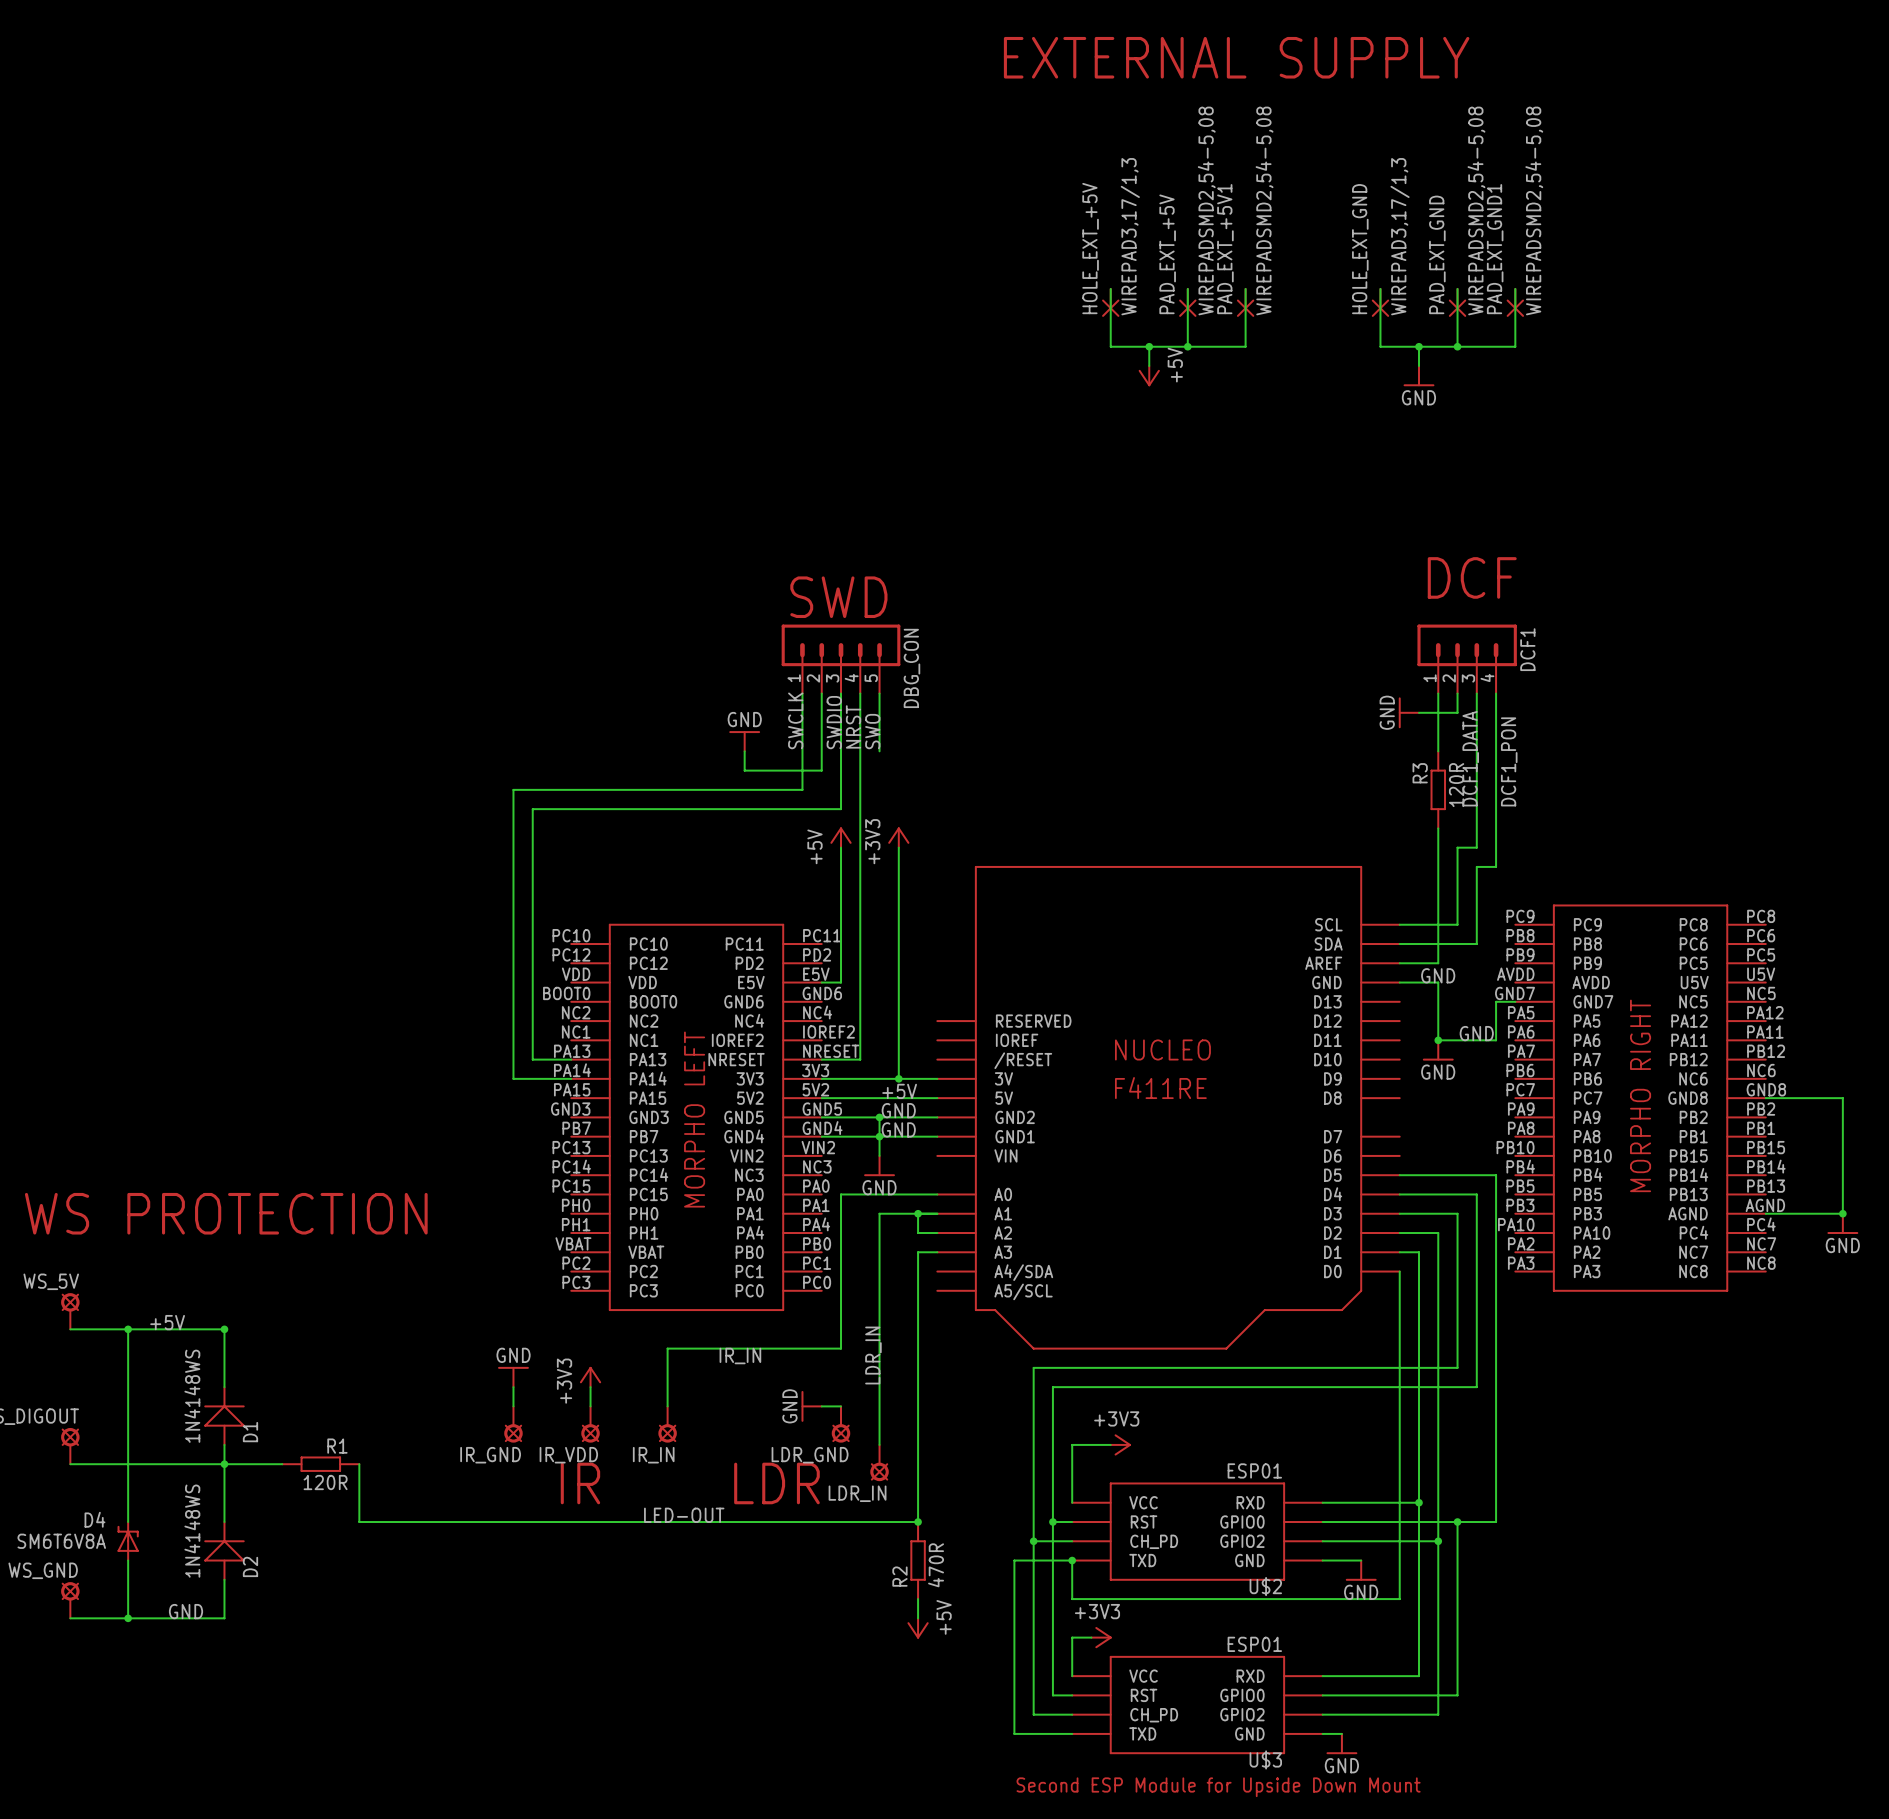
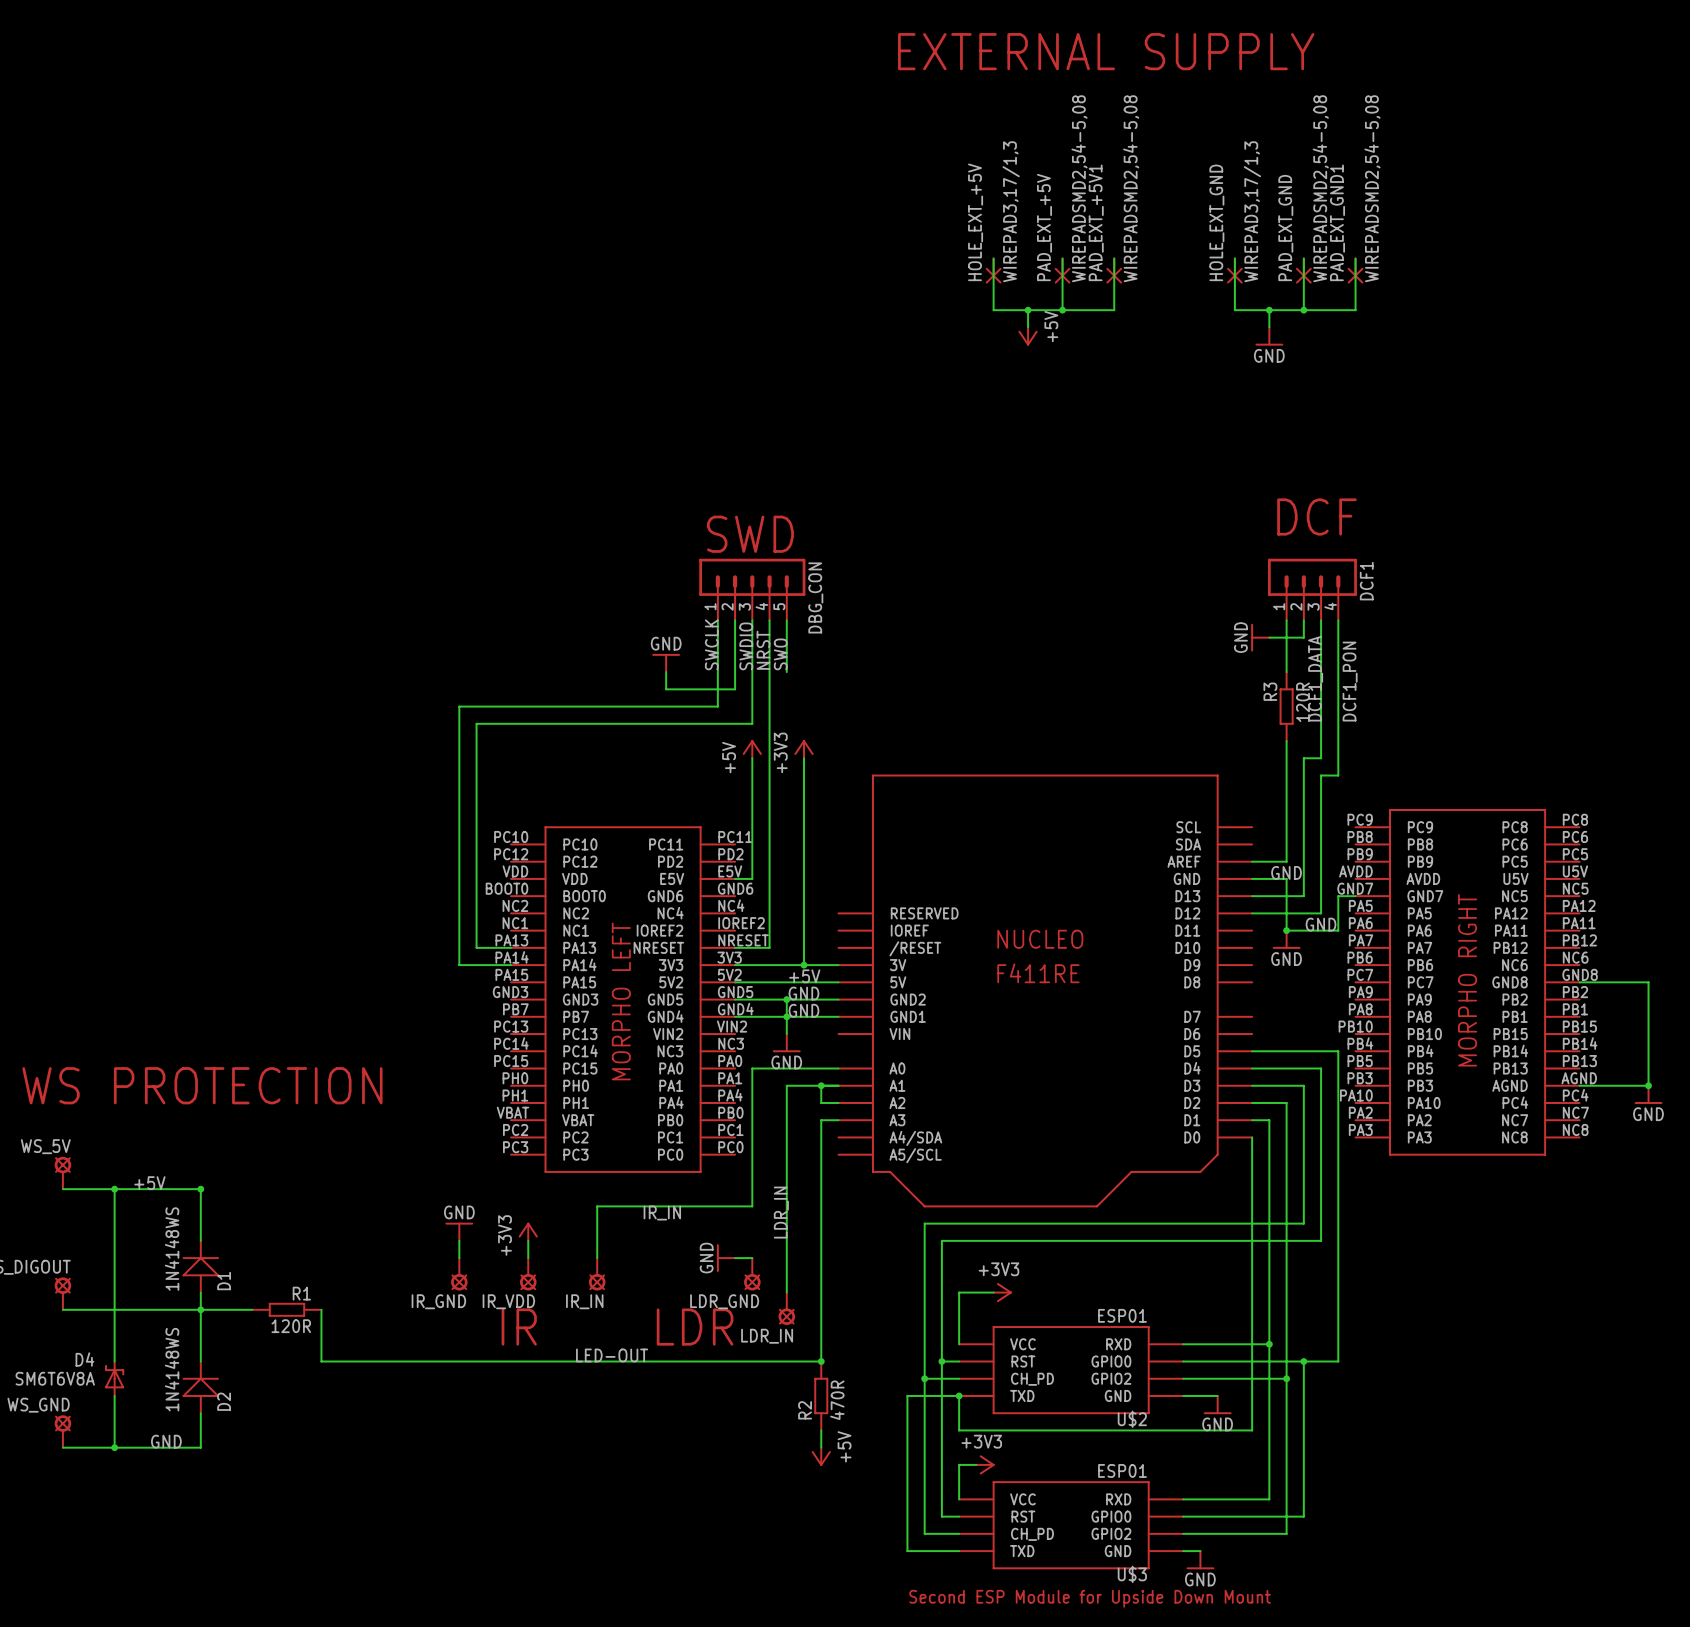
wire: (1399, 924) (1457, 924) -> (1252, 896) (1303, 896) (1303, 827)
wire: (1399, 944) (1476, 944) -> (1252, 913) (1321, 913) (1321, 844)

